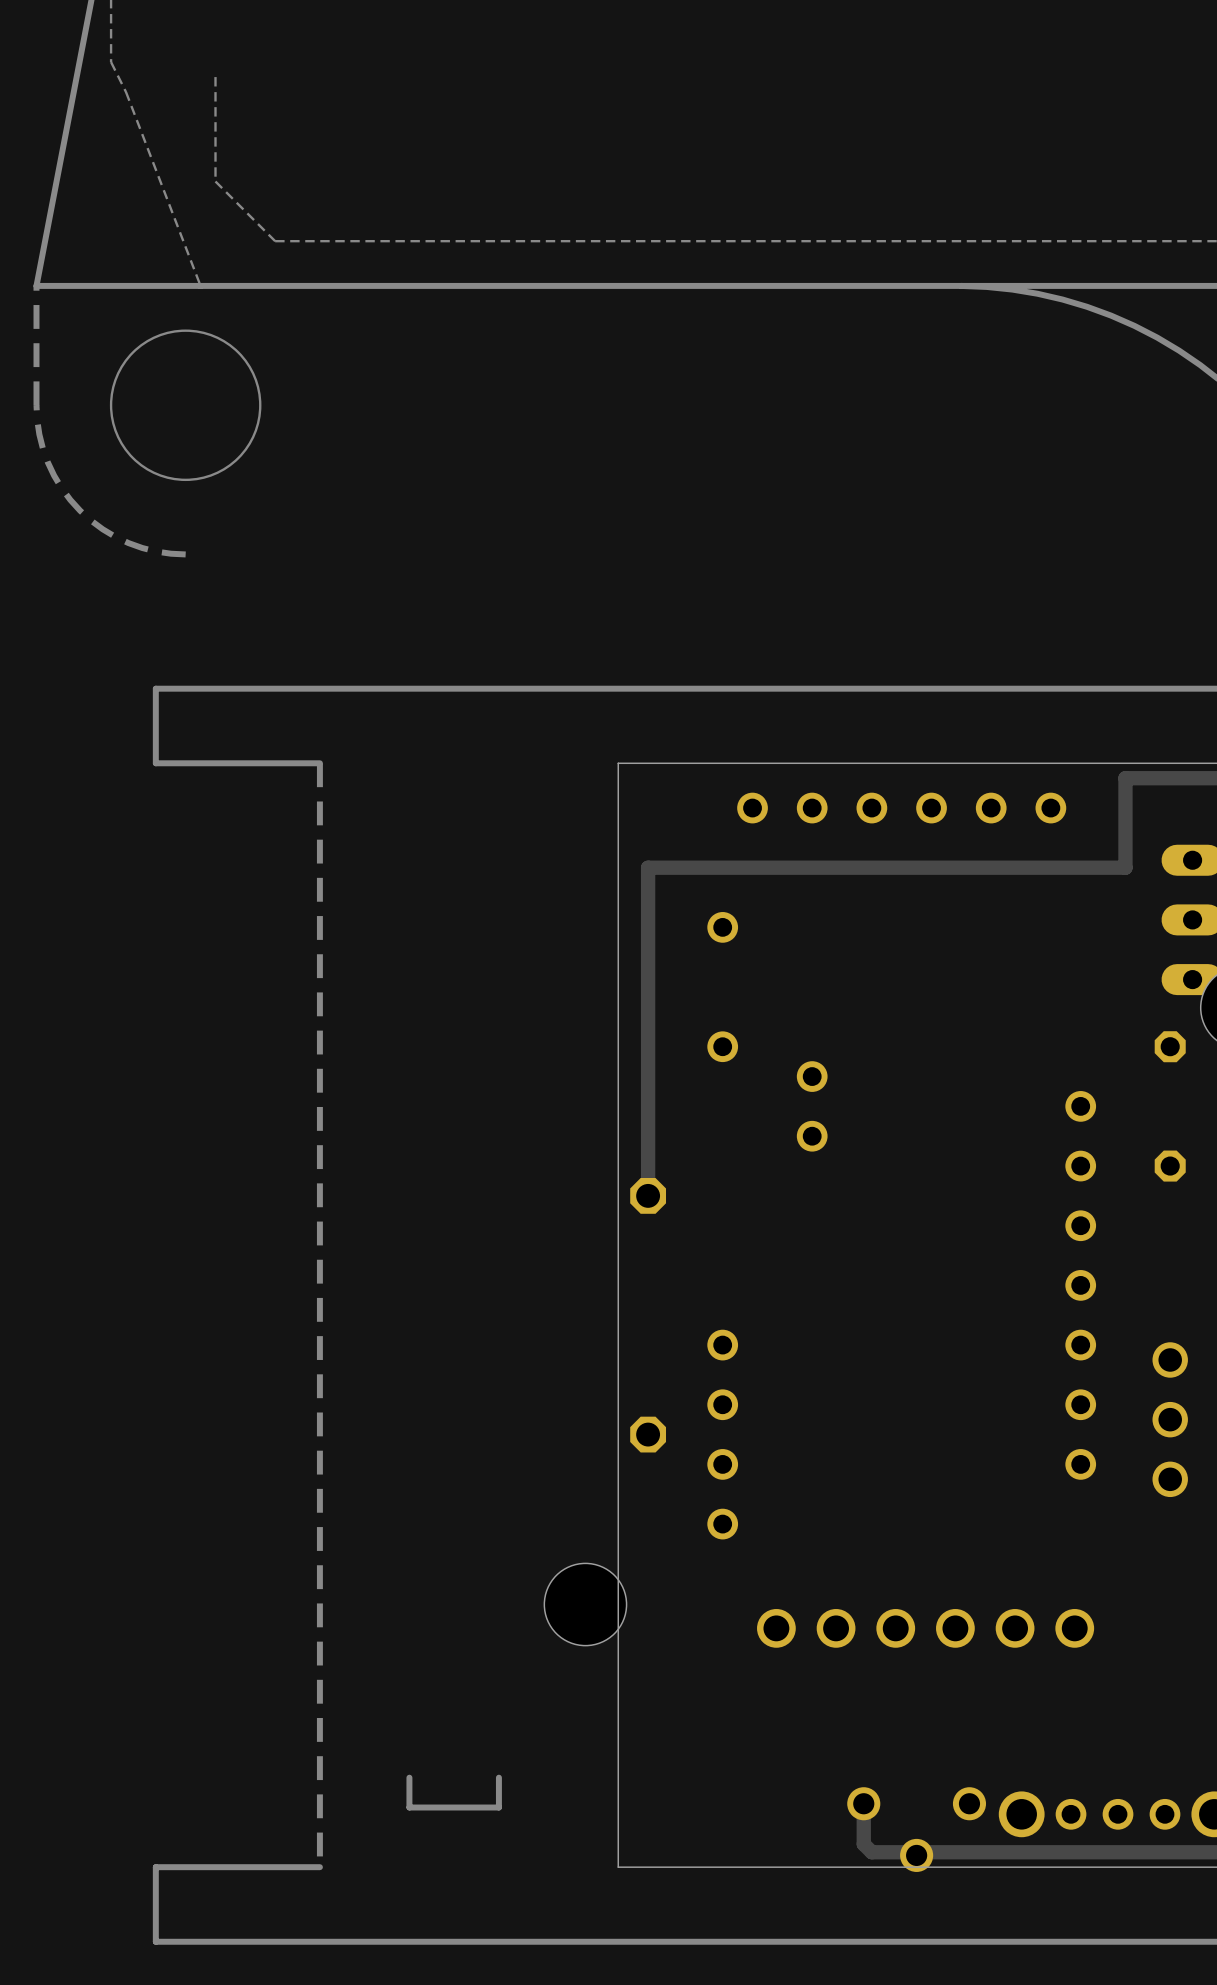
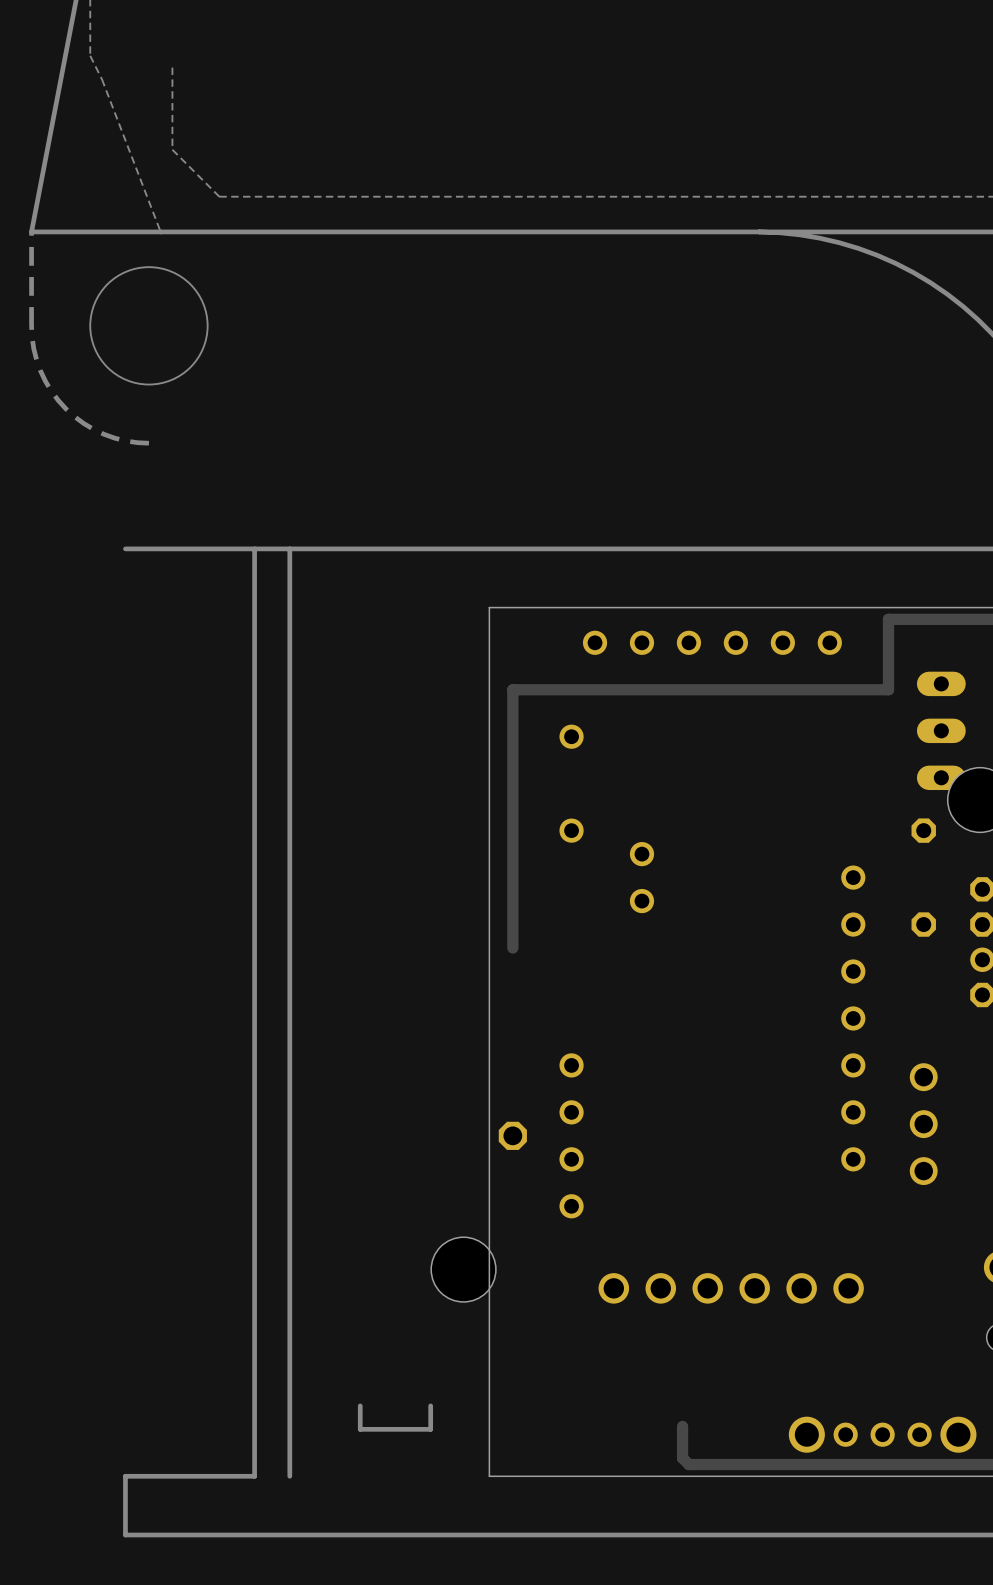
line: (155, 688) (155, 763) (319, 763) (319, 1867) -> (254, 548) (254, 1476)
line: none -> (289, 548) (289, 1476)
part: (648, 1195) -> none
line: (409, 1777) (409, 1807) (454, 1807) -> (360, 1405) (360, 1429)
line: (498, 1777) (498, 1807) -> (430, 1405) (430, 1429) (395, 1429)
part: (916, 1829) -> none

